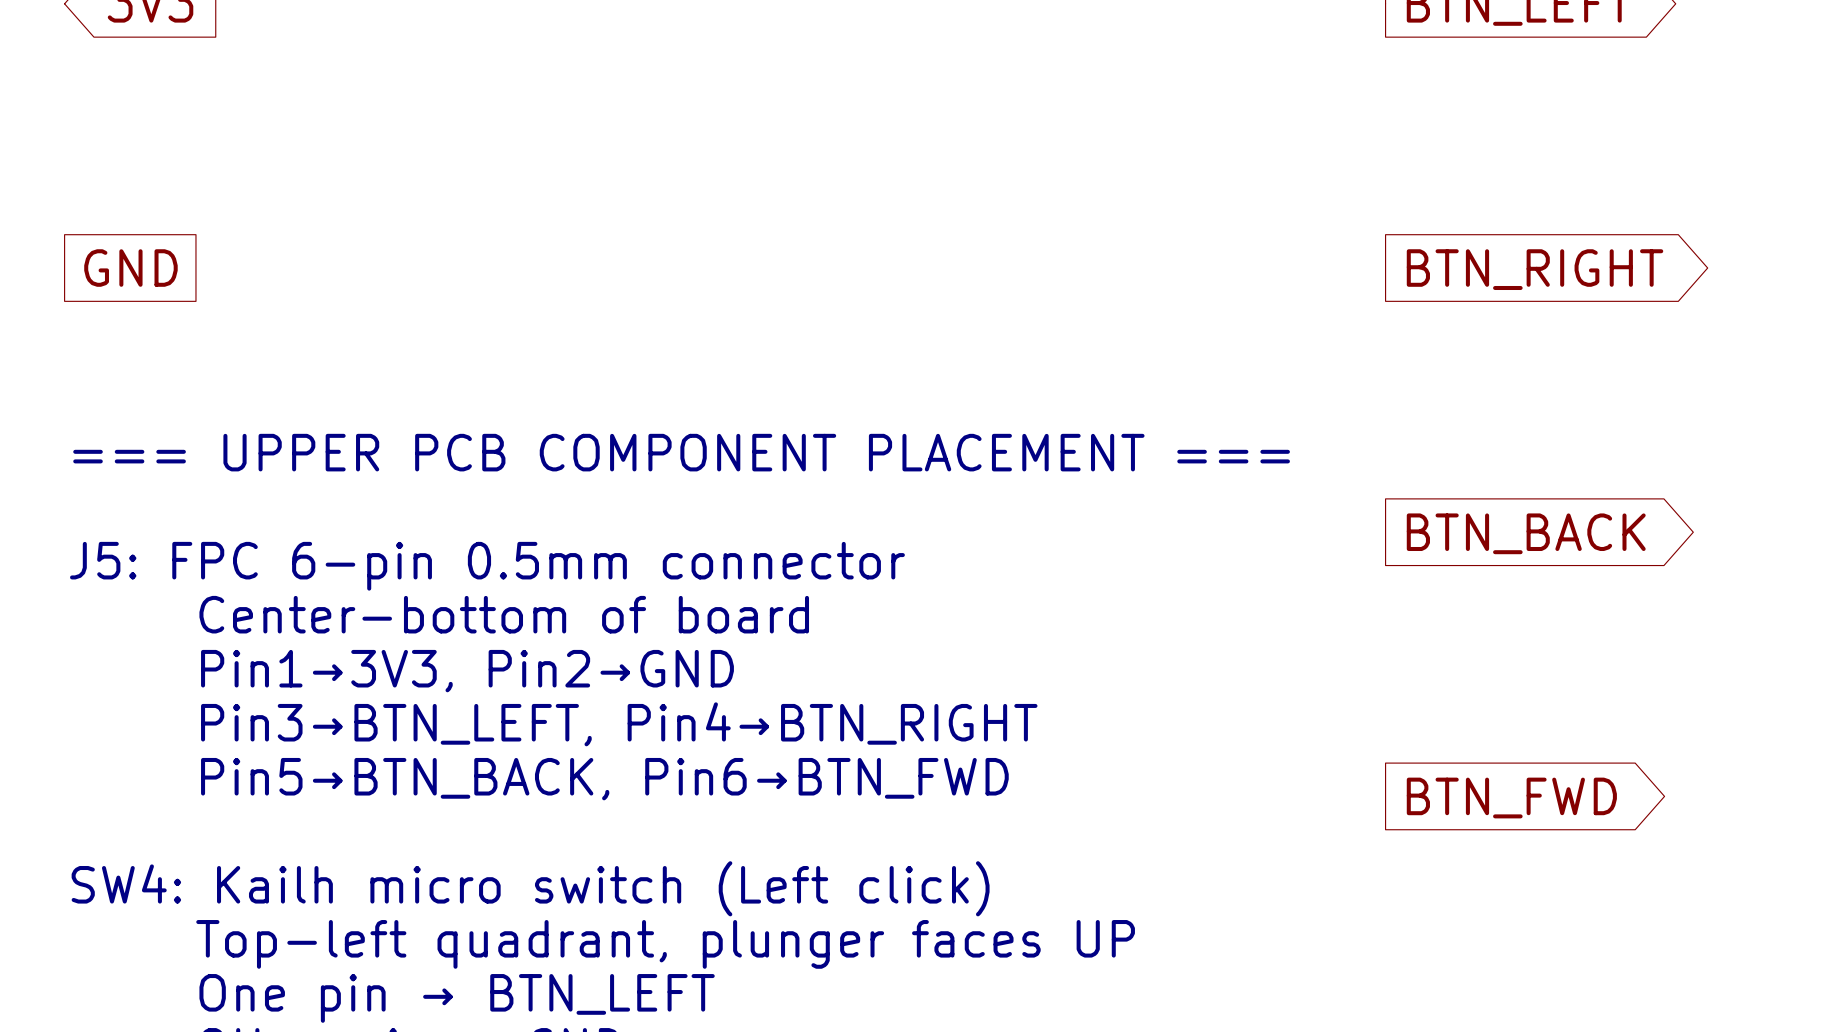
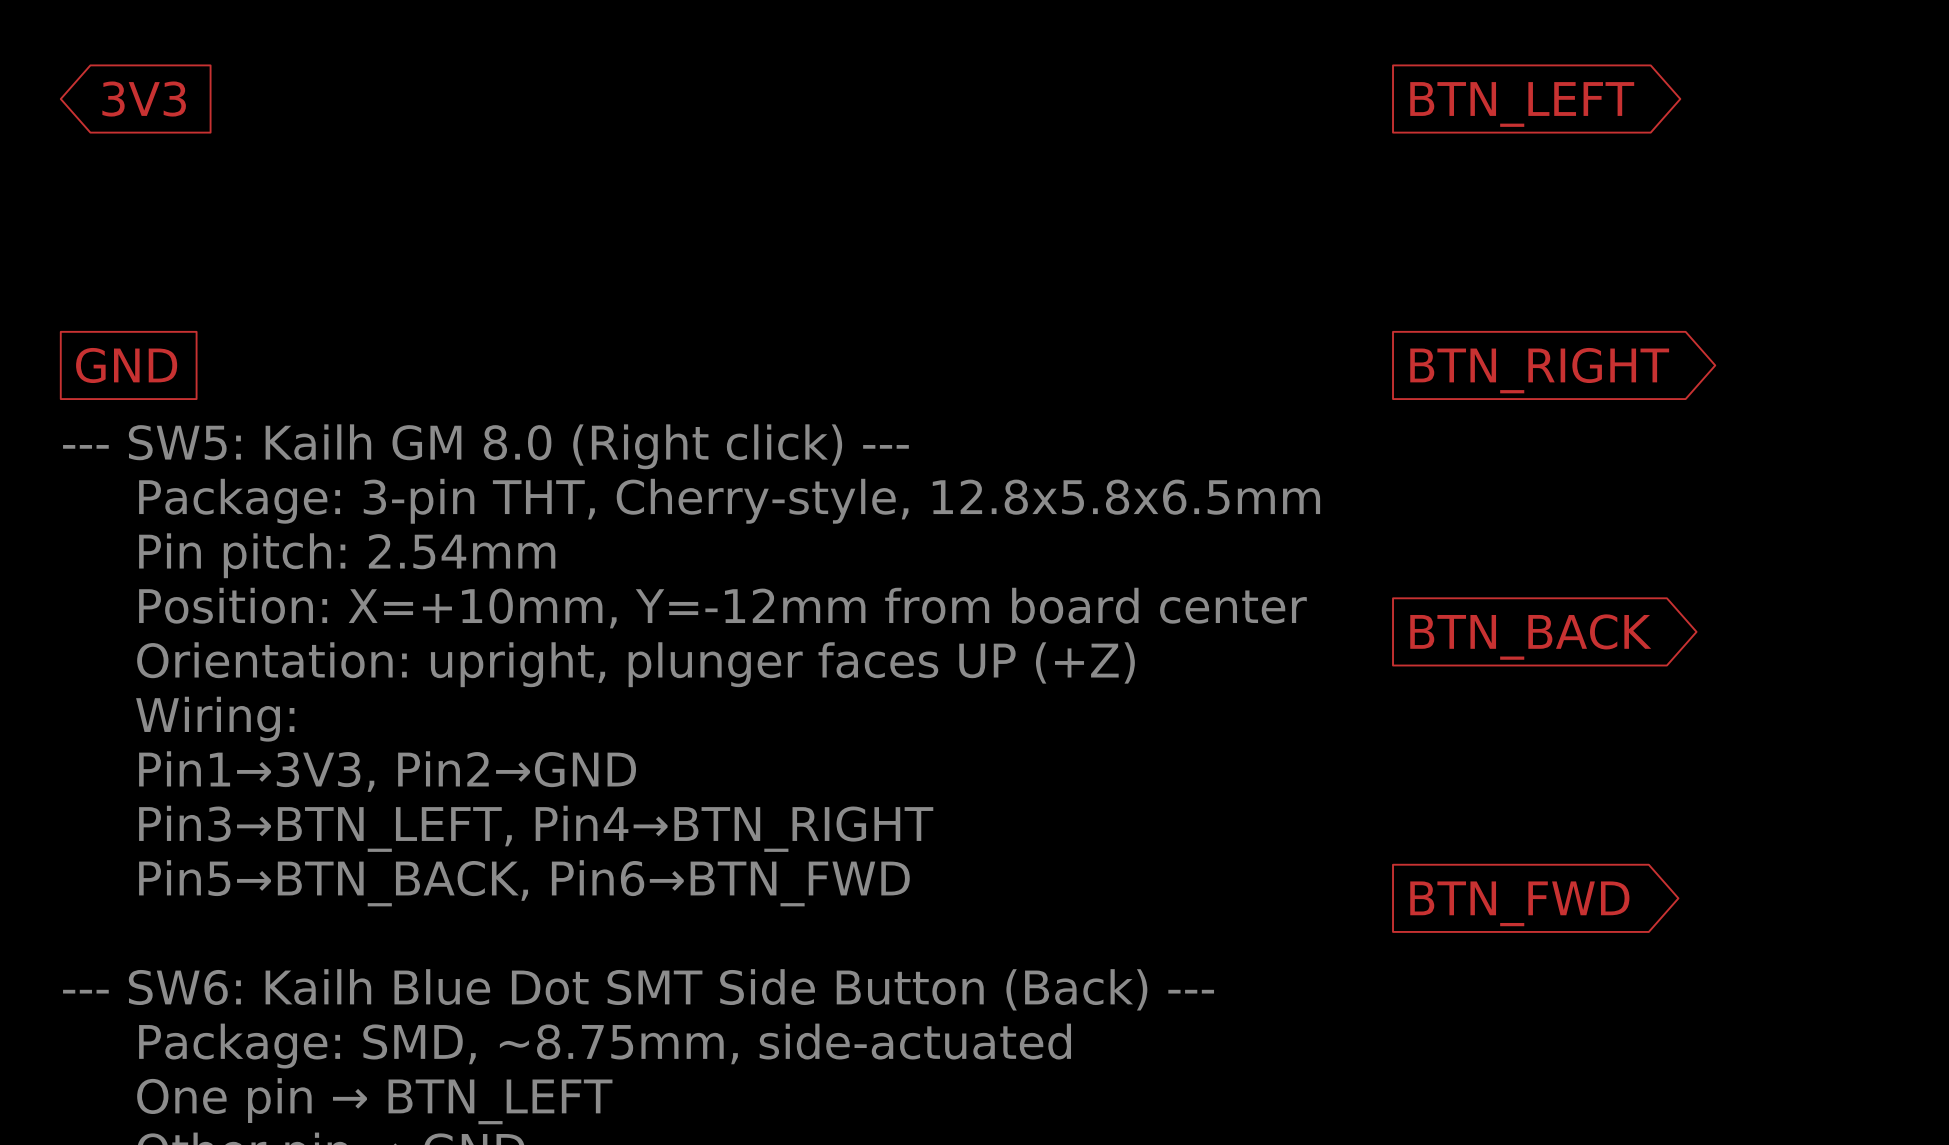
text: none -> --- SW5: Kailh GM 8.0 (Right click) --- (485, 446)
text: none -> Package: 3-pin THT, Cherry-style, 12.8x5.8x6.5mm (729, 501)
text: === UPPER PCB COMPONENT PLACEMENT === (681, 452) -> Pin pitch: 2.54mm (347, 555)
text: none -> Position: X=+10mm, Y=-12mm from board center (722, 608)
text: J5: FPC 6-pin 0.5mm connector (487, 566) -> Orientation: upright, plunger faces UP (+Z) (636, 664)
text: Center-bottom of board (504, 614) -> Wiring: (215, 719)
text: SW4: Kailh micro switch (Left click) (530, 888) -> --- SW6: Kailh Blue Dot SMT Side Button (Back) --- (638, 989)
text: Top-left quadrant, plunger faces UP (665, 944) -> Package: SMD, ~8.75mm, side-actuated (605, 1046)

